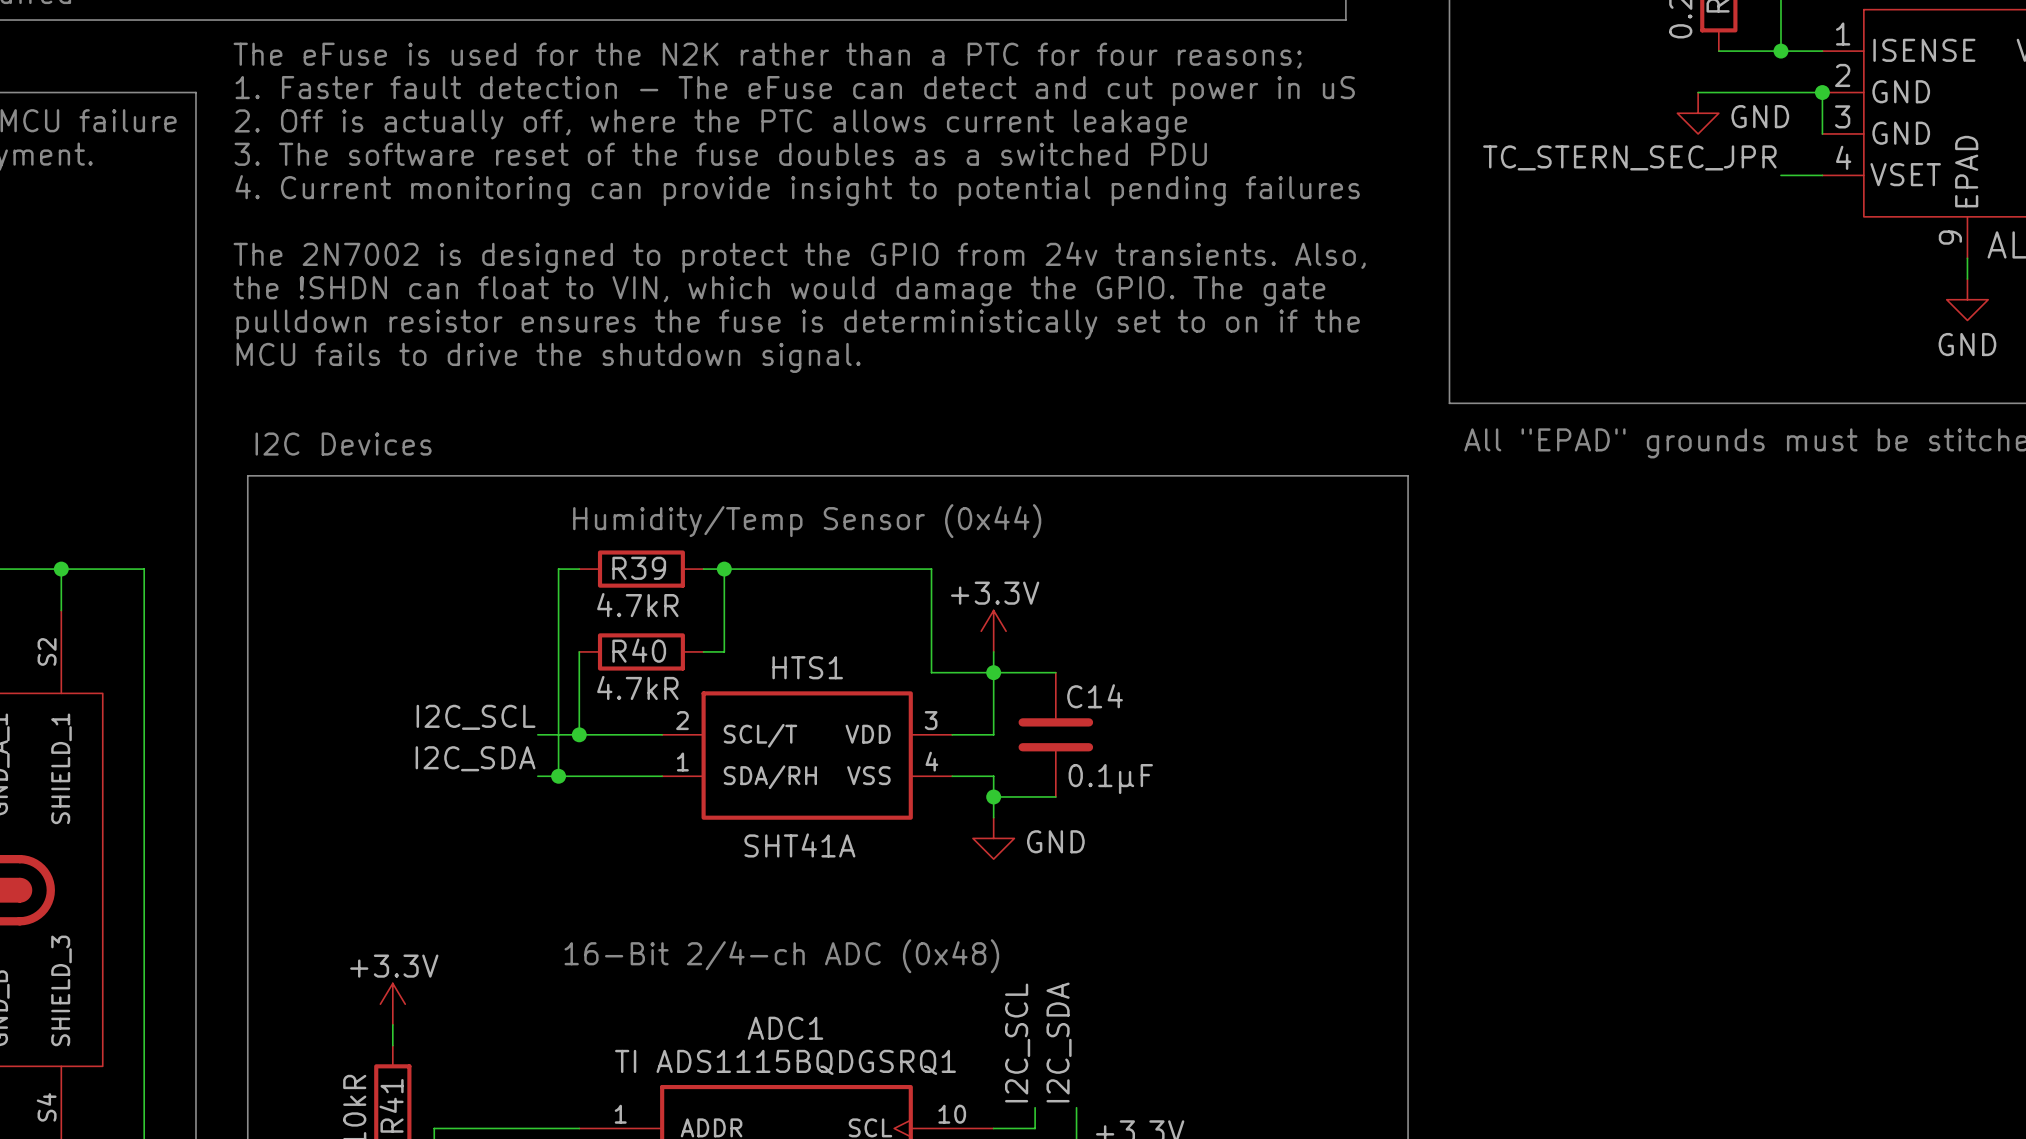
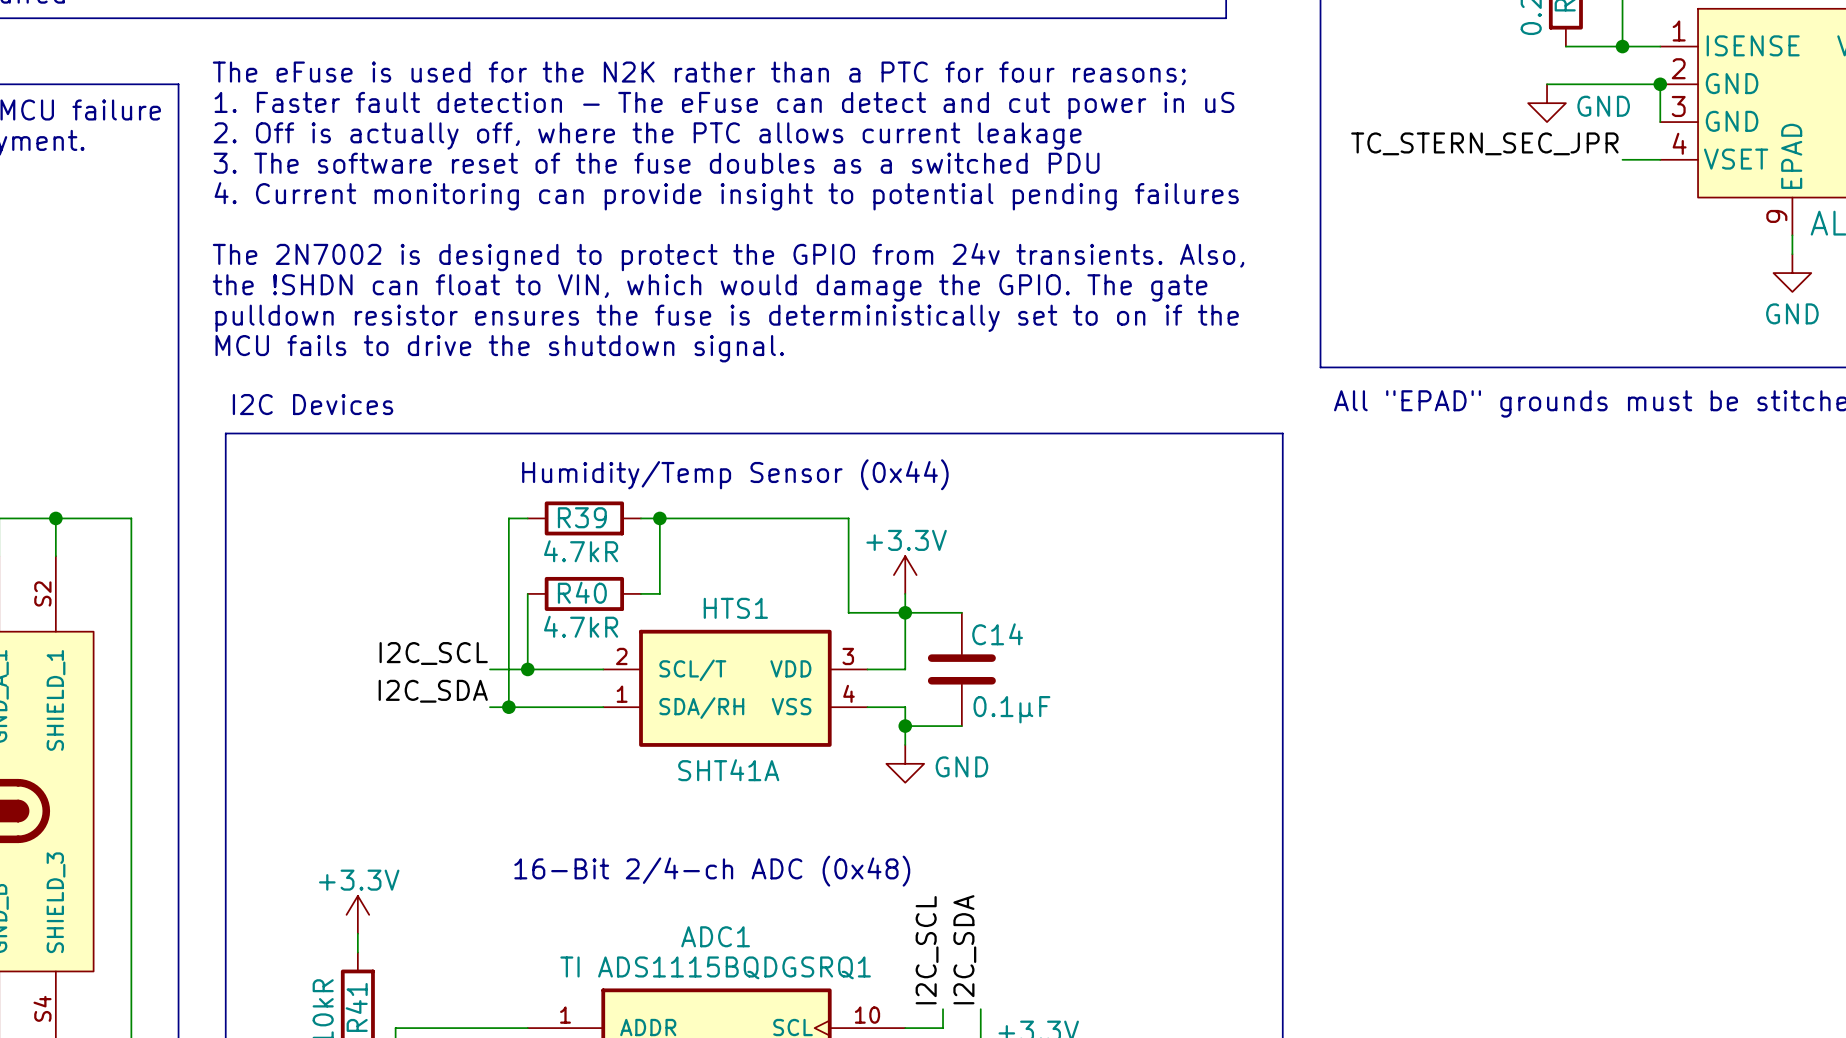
text position: The eFuse is used for the N2K rather than a PTC for four reasons; (767, 55) -> The eFuse is used for the N2K rather than a PTC for four reasons; (699, 73)
text position: 1. Faster fault detection - The eFuse can detect and cut power in uS (795, 91) -> 1. Faster fault detection - The eFuse can detect and cut power in uS (724, 105)
text position: 2. Off is actually off, where the PTC allows current leakage (710, 124) -> 2. Off is actually off, where the PTC allows current leakage (647, 135)
text position: 3. The software reset of the fuse doubles as a switched PDU (720, 154) -> 3. The software reset of the fuse doubles as a switched PDU (656, 163)
text position: 4. Current monitoring can provide insight to potential pending failures (797, 190) -> 4. Current monitoring can provide insight to potential pending failures (726, 196)
text position: The 2N7002 is designed to protect the GPIO from 24v transients. Also, (799, 257) -> The 2N7002 is designed to protect the GPIO from 24v transients. Also, (728, 257)
text position: the !SHDN can float to VIN, which would damage the GPIO. The gate (779, 291) -> the !SHDN can float to VIN, which would damage the GPIO. The gate (710, 287)
text position: pulldown resistor ensures the fuse is deterministically set to on if the (798, 324) -> pulldown resistor ensures the fuse is deterministically set to on if the (727, 318)
text position: MCU fails to drive the shutdown signal. (548, 357) -> MCU fails to drive the shutdown signal. (499, 348)

